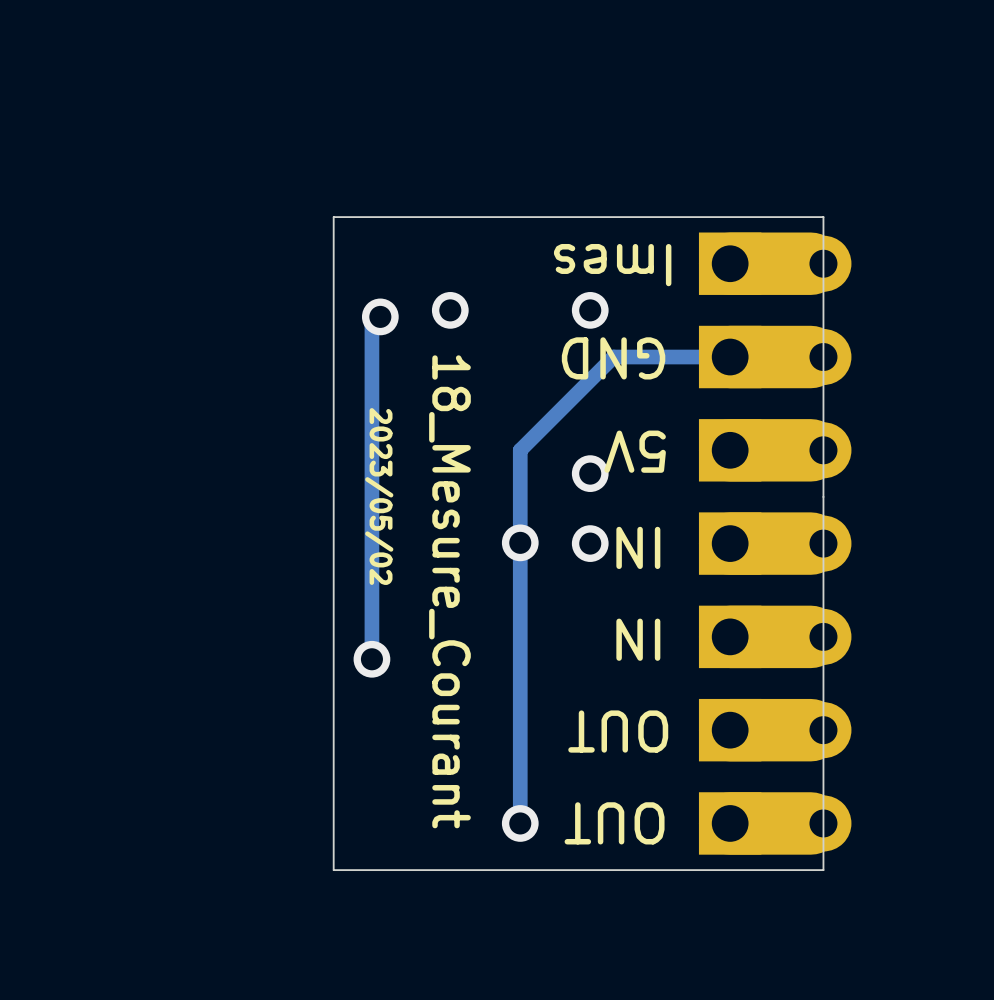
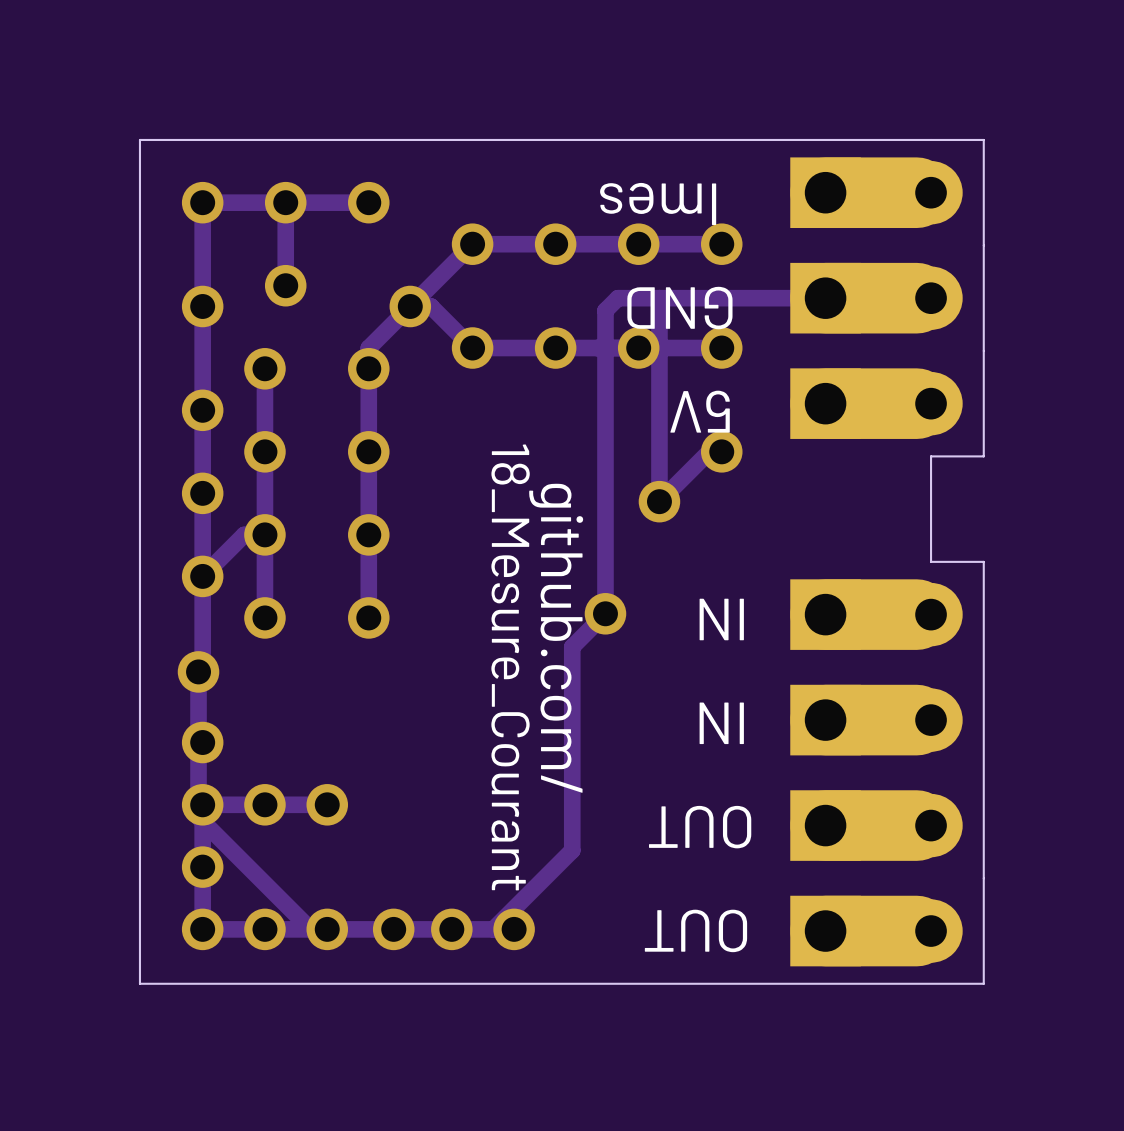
via: none -> (202, 202)
track: none -> (285, 202) (285, 285)
via: none -> (285, 202)
track: none -> (368, 202) (202, 202) (202, 667) (198, 671) (198, 817) (310, 929)
via: none -> (368, 202)
via: none -> (472, 244)
via: none -> (555, 244)
via: none -> (638, 244)
track: none -> (721, 244) (472, 244) (368, 348) (368, 617)
via: none -> (721, 244)
via: none -> (285, 285)
track: none -> (659, 298) (659, 501) (709, 451) (721, 451)
track: none -> (825, 298) (617, 298) (605, 310) (605, 613) (572, 647) (572, 850) (493, 929) (202, 929) (202, 804) (327, 804)
text position: Imes (612, 265) -> Imes (658, 203)
via: none -> (202, 306)
track: none -> (410, 306) (431, 306) (472, 348) (721, 348)
via: none -> (410, 306)
via: none -> (555, 348)
via: none -> (721, 348)
via position: (450, 310) -> (472, 348)
via position: (590, 310) -> (638, 348)
track: (380, 316) (371, 325) (371, 659) -> none
via: (380, 316) -> none
track: none -> (264, 368) (264, 617)
via: none -> (264, 368)
via: none -> (368, 368)
track: (730, 357) (613, 357) (520, 450) (520, 823) -> none
text position: GND (613, 358) -> GND (679, 308)
via: none -> (202, 410)
via: none -> (264, 451)
via: none -> (368, 451)
via: none -> (721, 451)
board edge: (823, 403) (823, 217) (333, 217) (333, 870) -> (931, 456) (983, 456) (983, 139) (139, 139) (139, 983) (377, 983)
via: none -> (202, 493)
part position: (775, 450) -> (876, 192)
text position: 5V (635, 451) -> 5V (700, 411)
track: none -> (264, 534) (244, 534) (202, 576)
via: none -> (264, 534)
via: none -> (368, 534)
via position: (590, 473) -> (659, 501)
text: 2023/05/02 (379, 496) -> none
board edge: (823, 496) (823, 870) -> (931, 561) (983, 561) (983, 983) (931, 983)
via: none -> (202, 576)
via position: (520, 542) -> (605, 613)
via: (590, 543) -> none
via: none -> (264, 617)
via: none -> (368, 617)
text: none -> github.com/ (556, 638)
via: none -> (198, 671)
via: none -> (202, 742)
via: (371, 659) -> none
via: none -> (202, 804)
via: none -> (264, 804)
via: none -> (327, 804)
via: none -> (202, 867)
via: none -> (202, 929)
via: none -> (264, 929)
via: none -> (327, 929)
via: none -> (393, 929)
via: none -> (451, 929)
via: none -> (514, 929)
via: (520, 823) -> none

